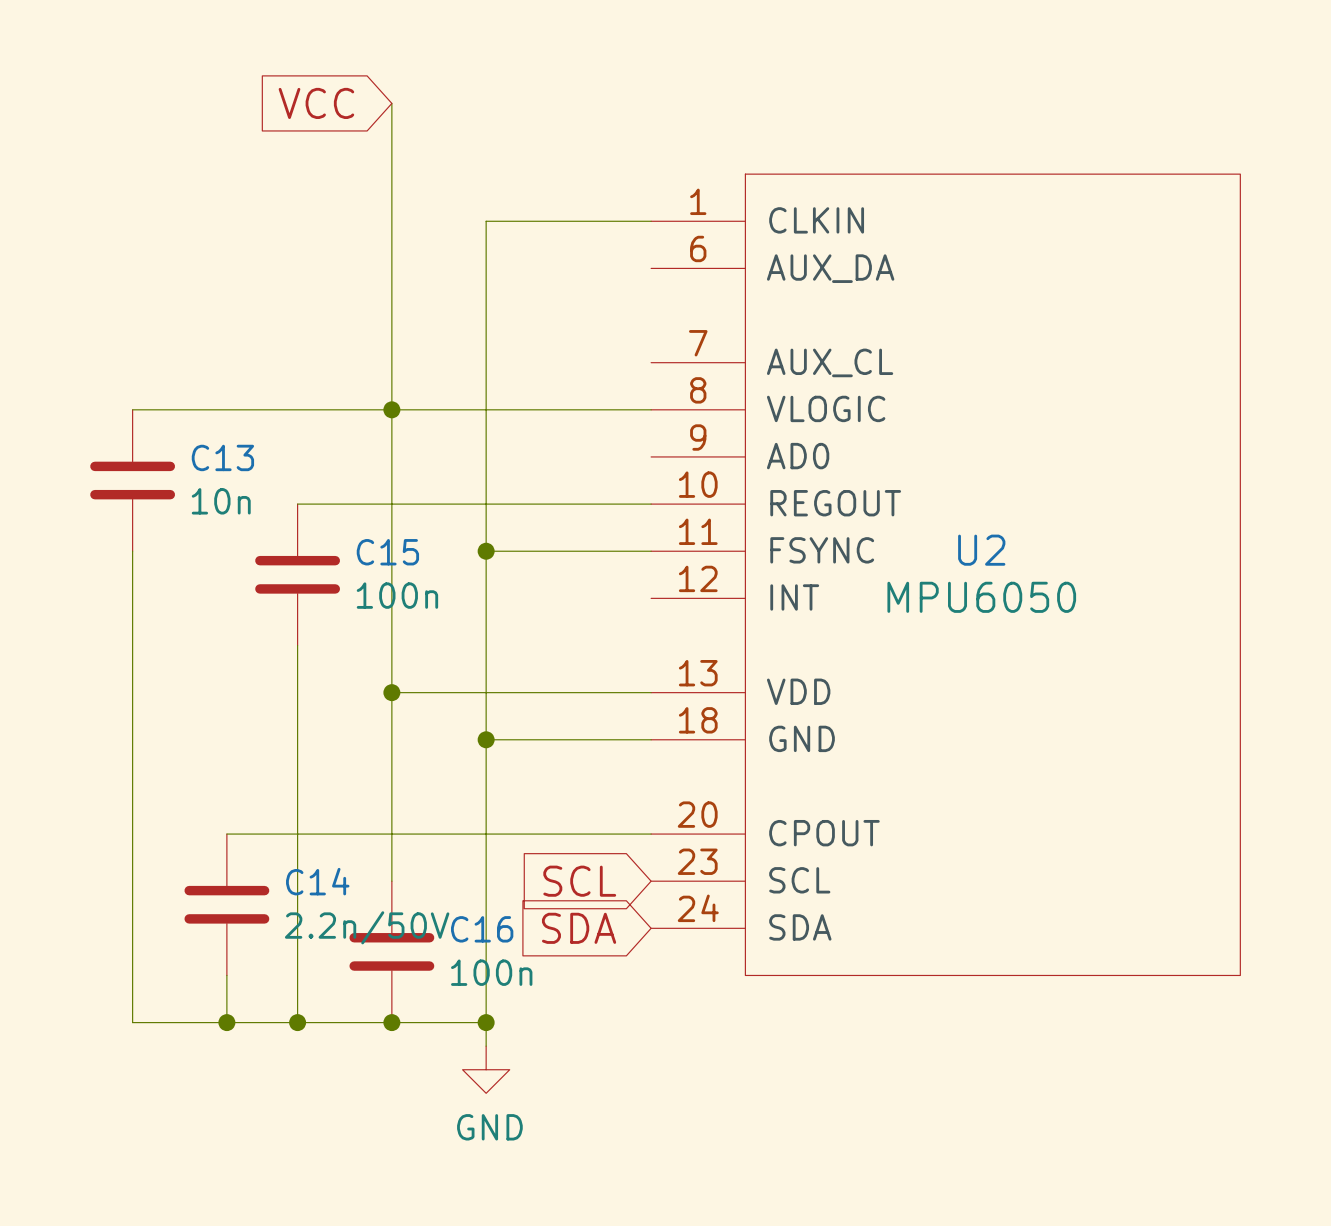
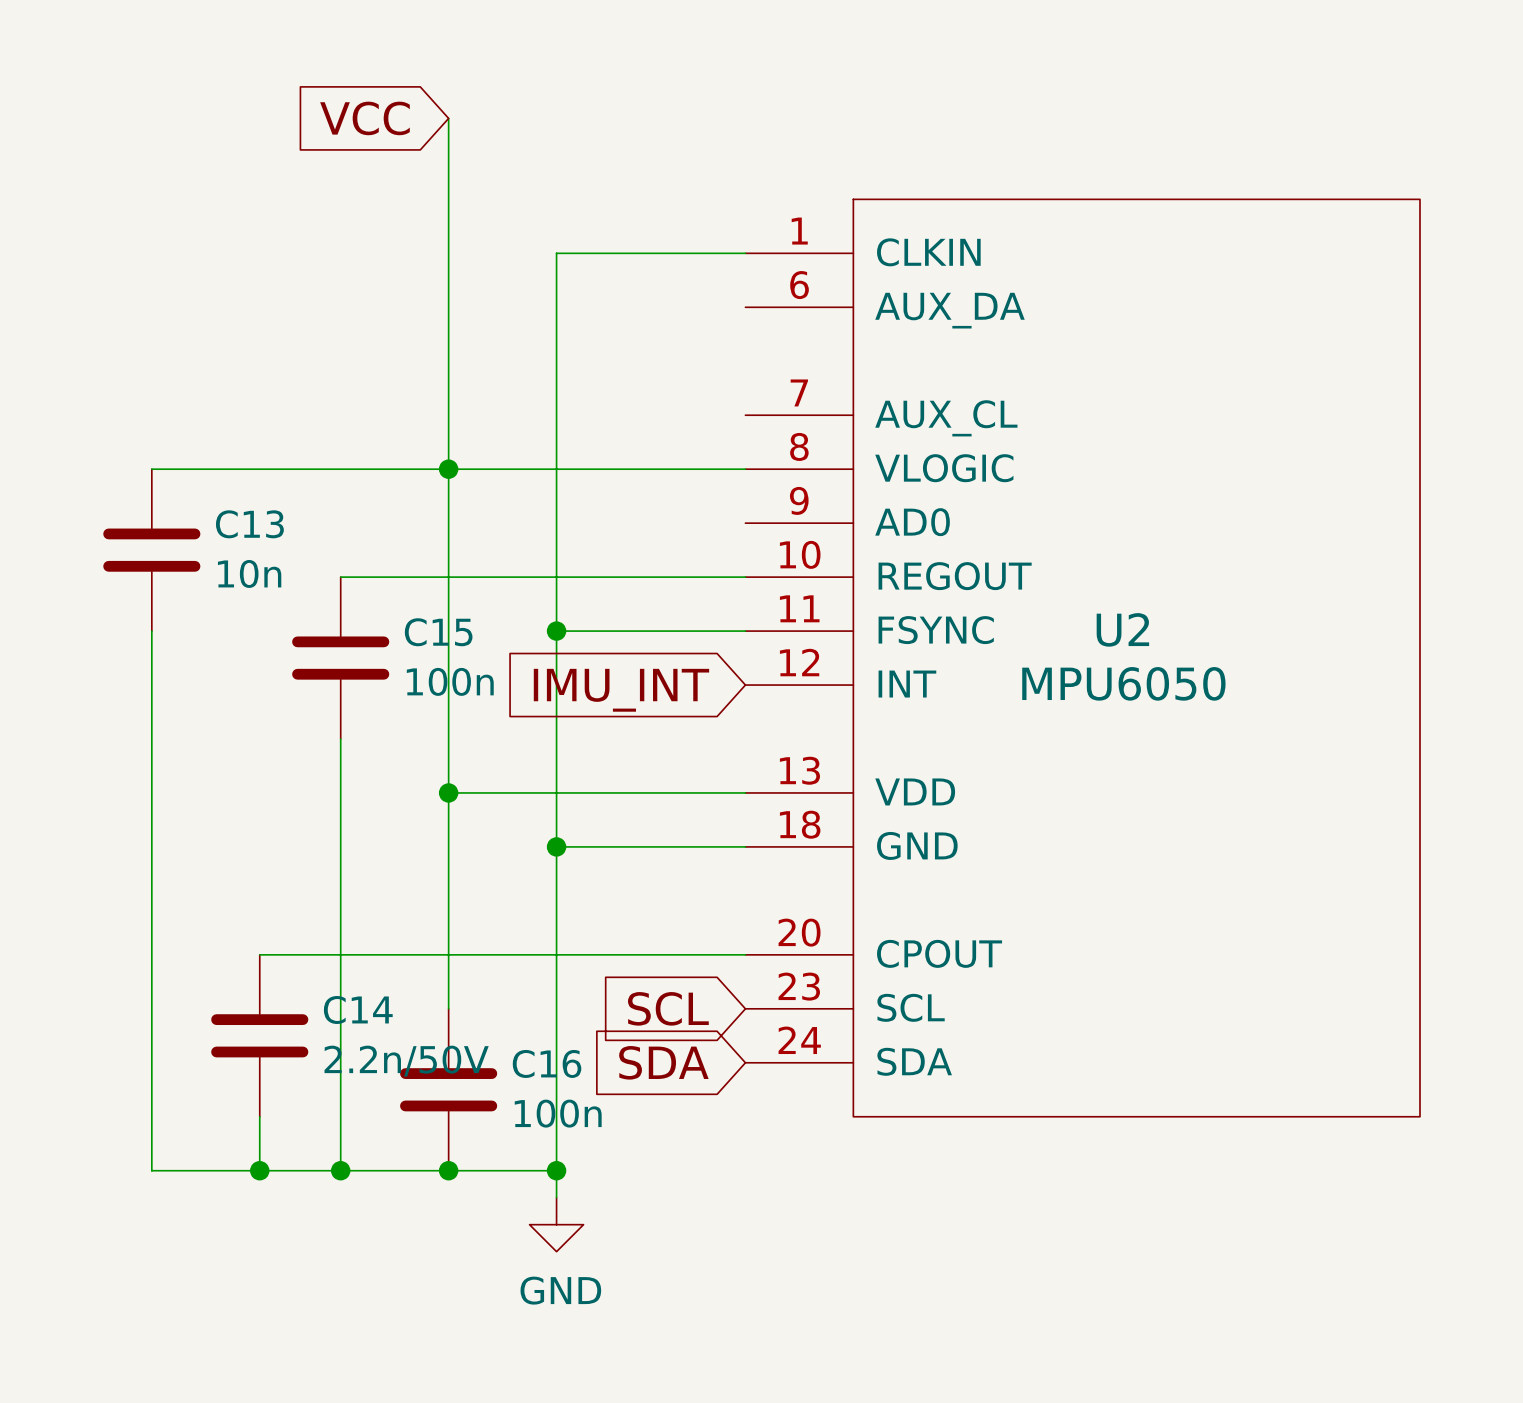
global label: none -> IMU_INT (621, 690)

